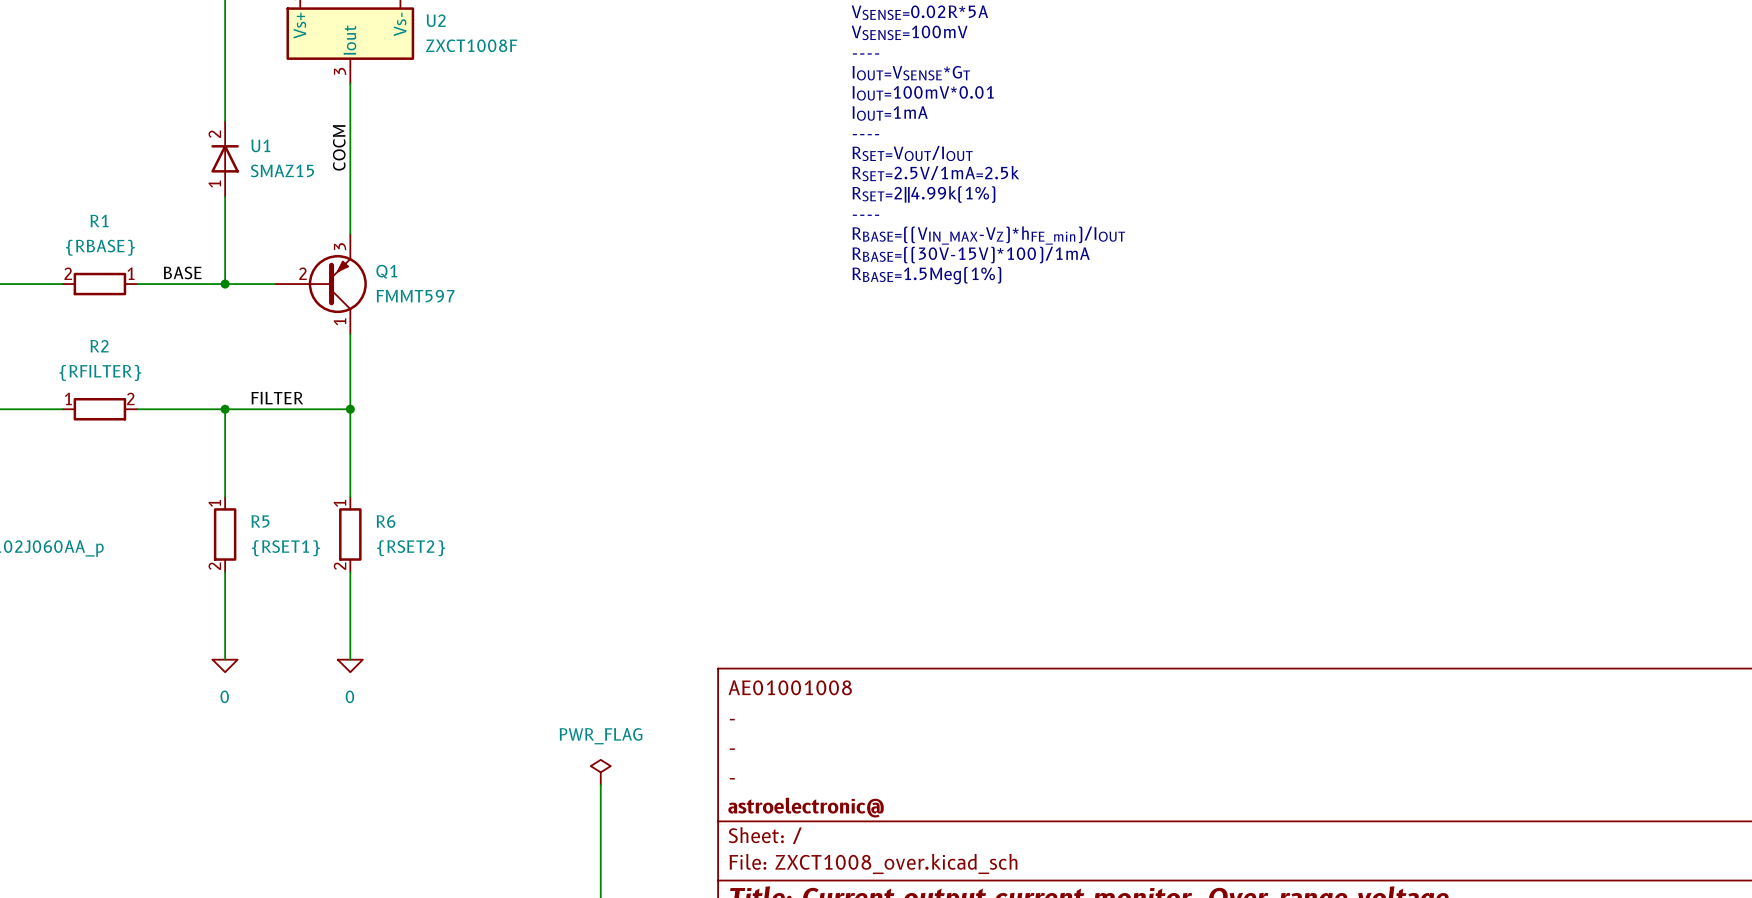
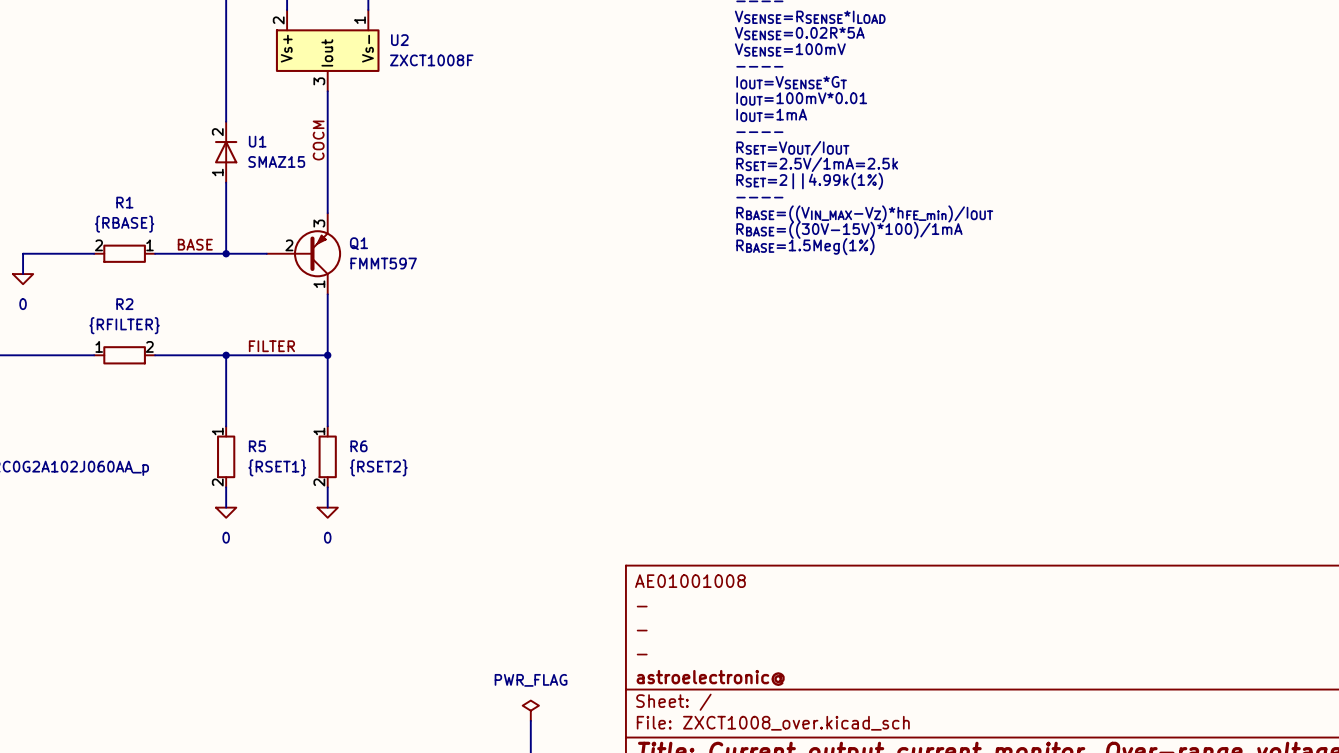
wire: (225, 597) (225, 659) -> none
wire: (350, 597) (350, 659) -> none
power symbol position: 0 (225, 665) -> 0 (226, 512)
power symbol position: 0 (350, 665) -> 0 (327, 512)
power symbol position: PWR_FLAG (600, 772) -> PWR_FLAG (530, 710)
wire: (600, 784) (600, 860) -> none

